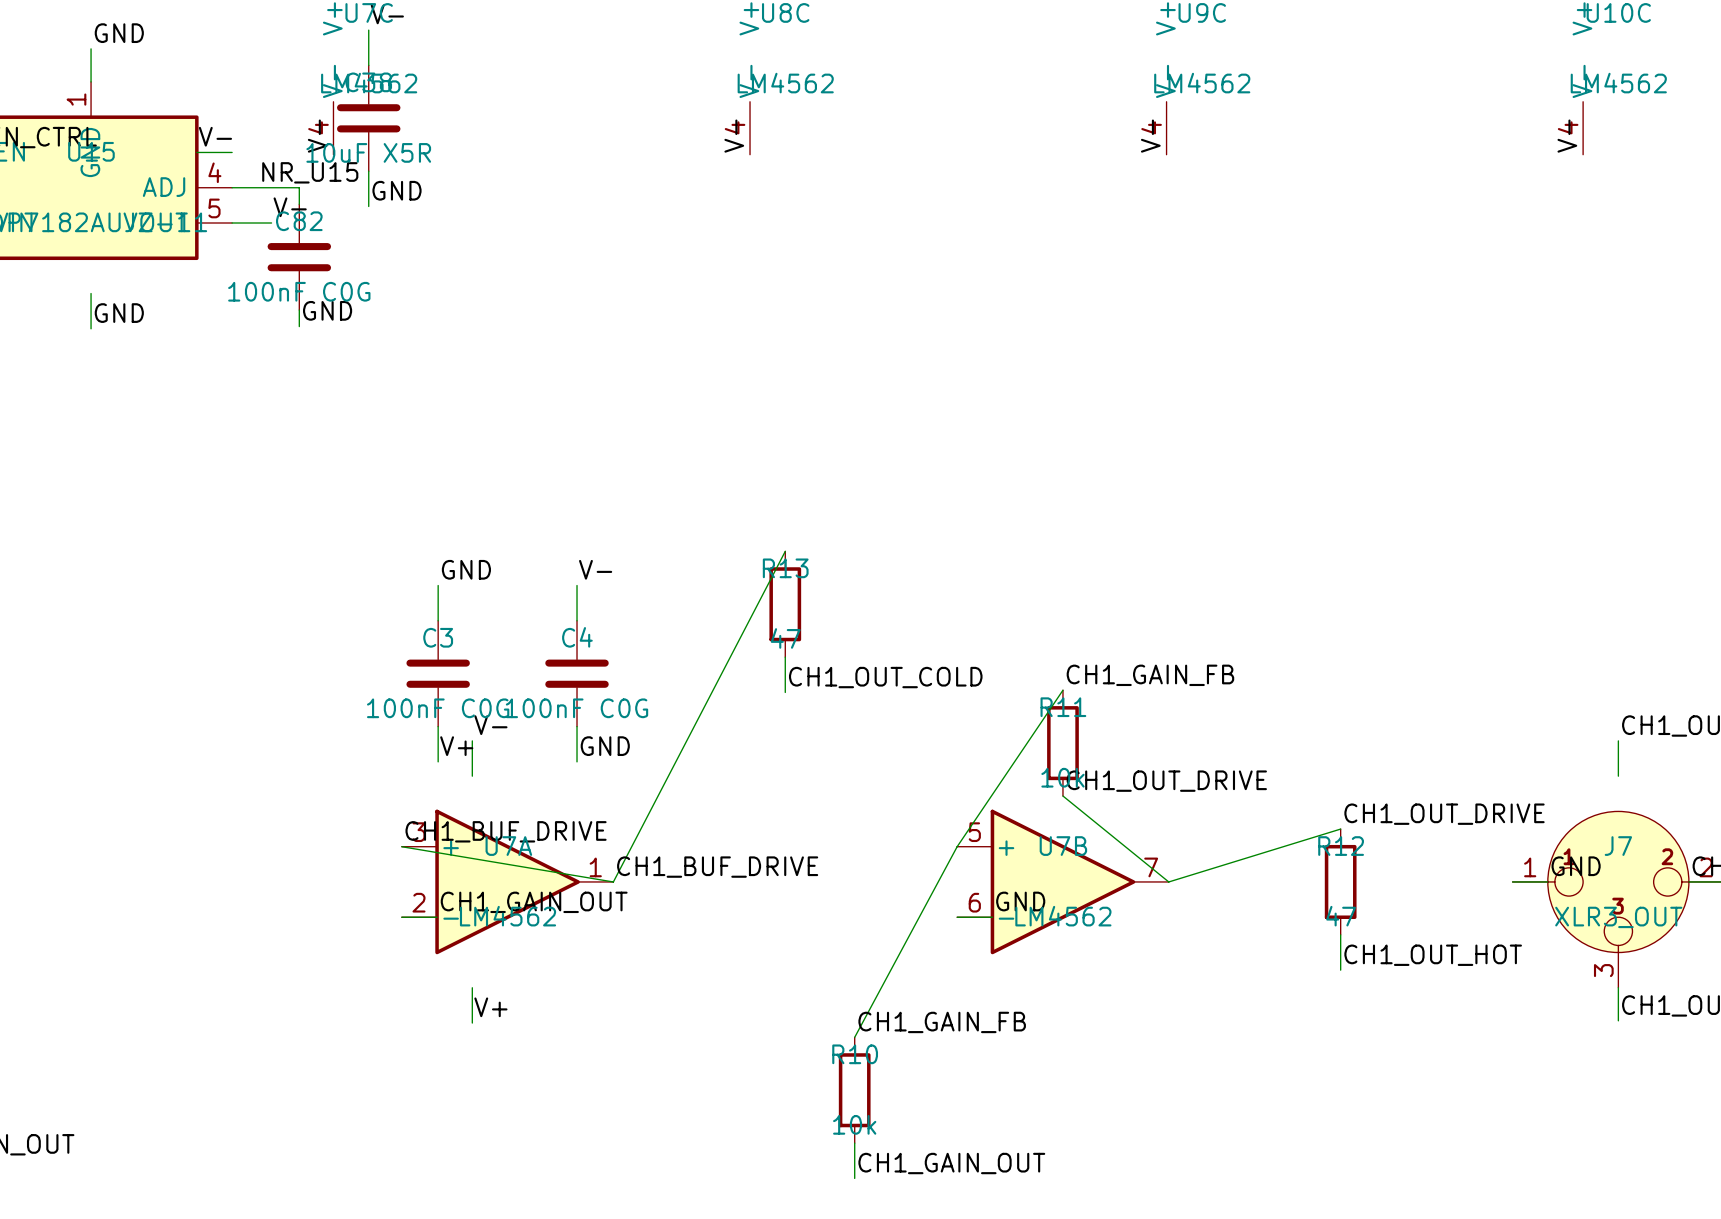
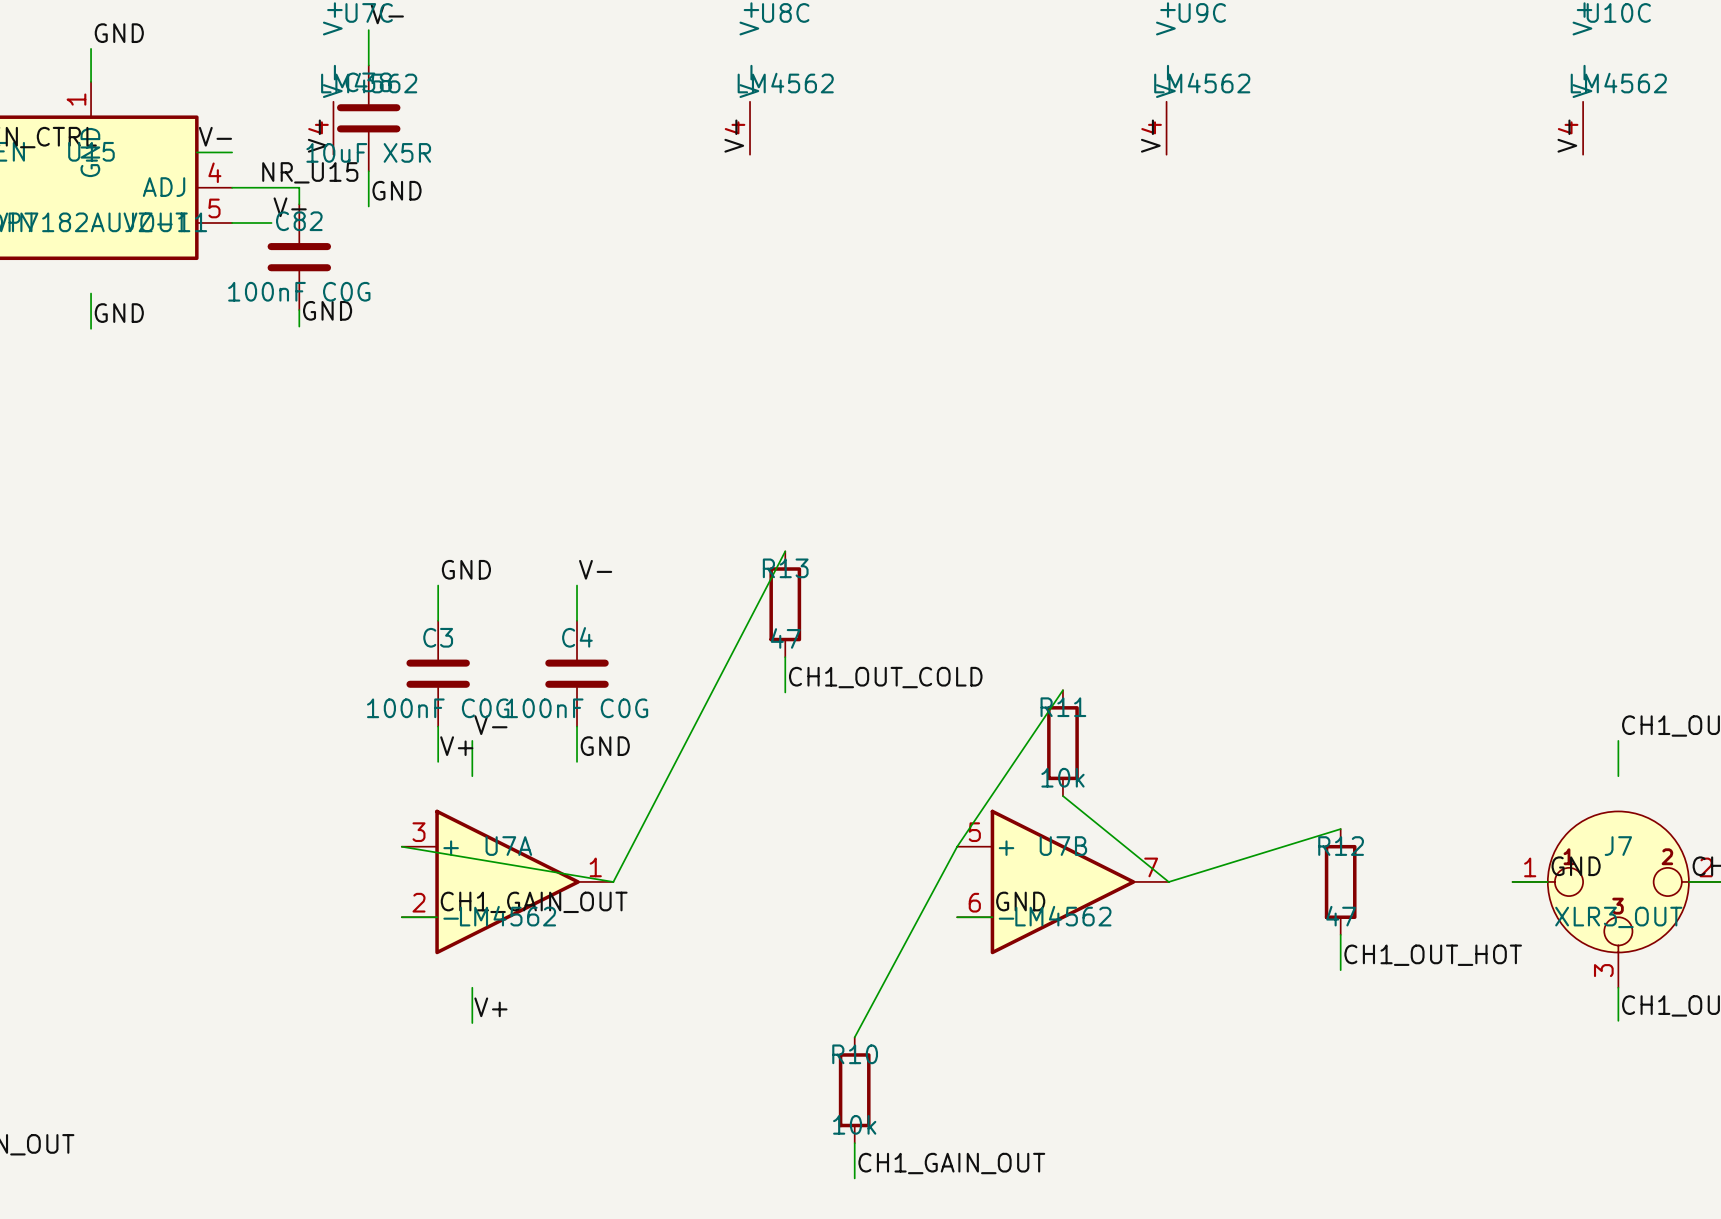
label: CH1_GAIN_FB (1150, 675) -> none
label: CH1_OUT_DRIVE (1166, 781) -> none
label: CH1_OUT_DRIVE (1444, 814) -> none
label: CH1_BUF_DRIVE (506, 831) -> none
label: CH1_BUF_DRIVE (717, 867) -> none
label: CH1_GAIN_FB (942, 1022) -> none

